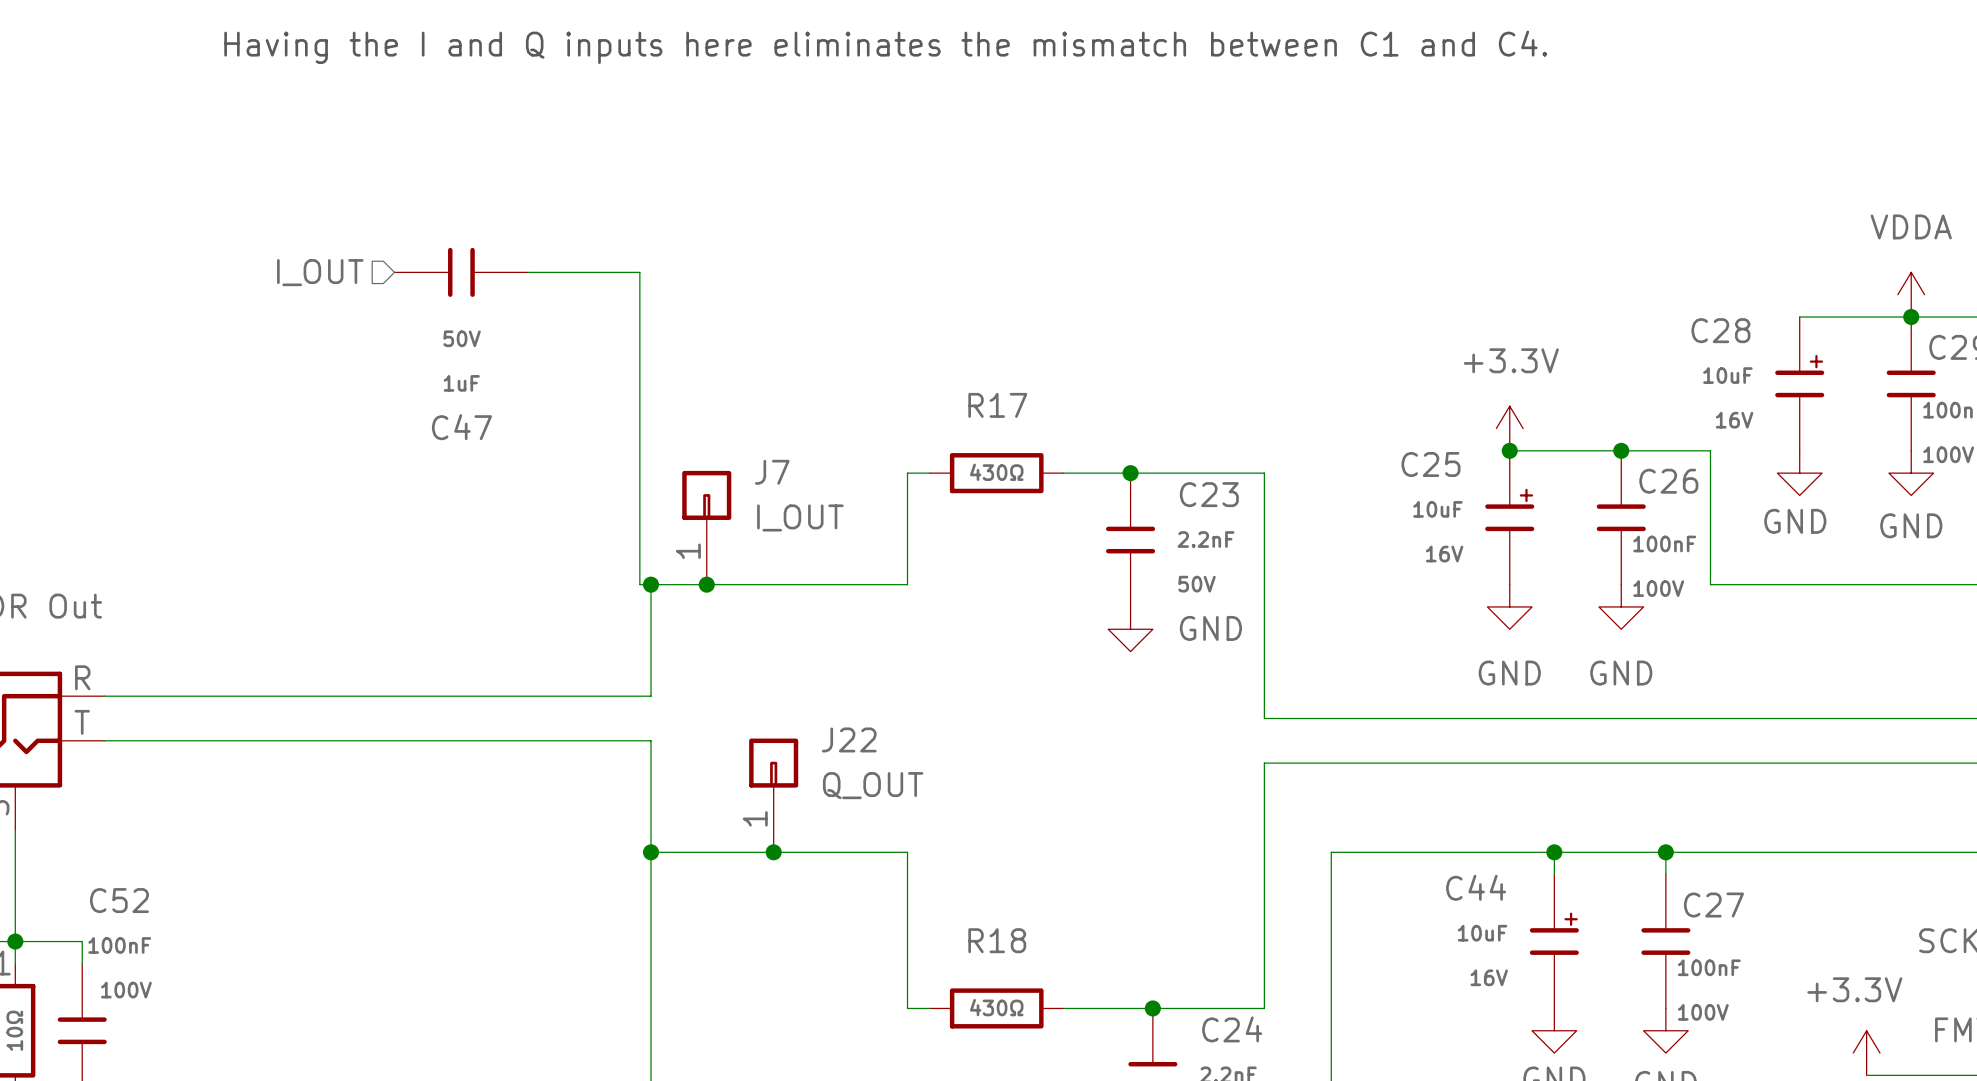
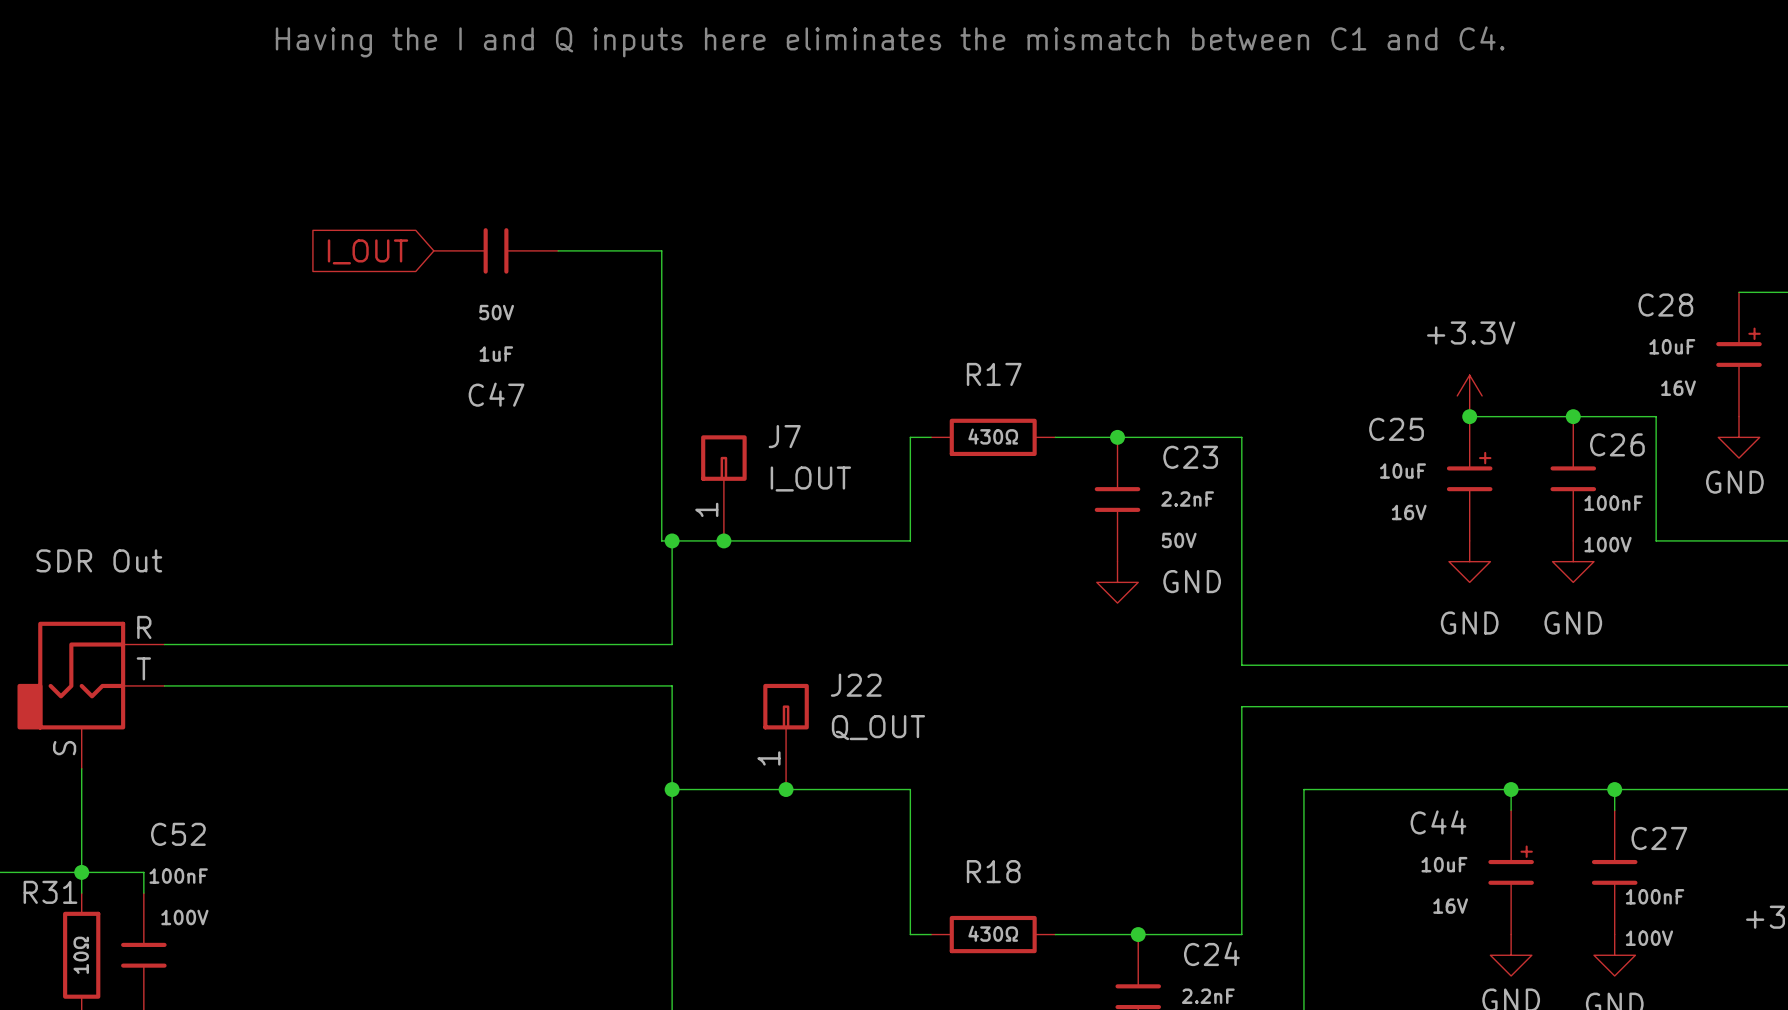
hierarchical label: I_OUT (320, 272) -> none
global label: none -> I_OUT (367, 251)

